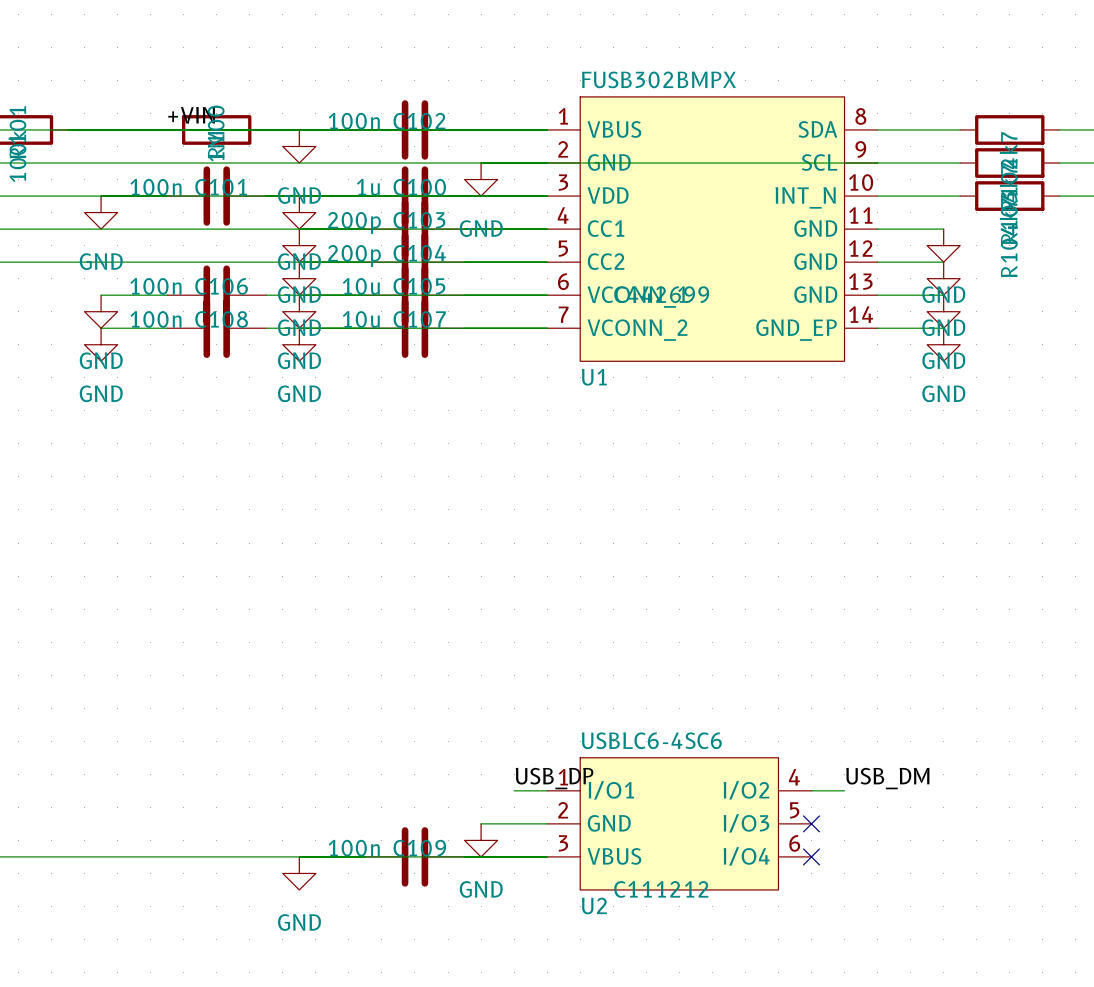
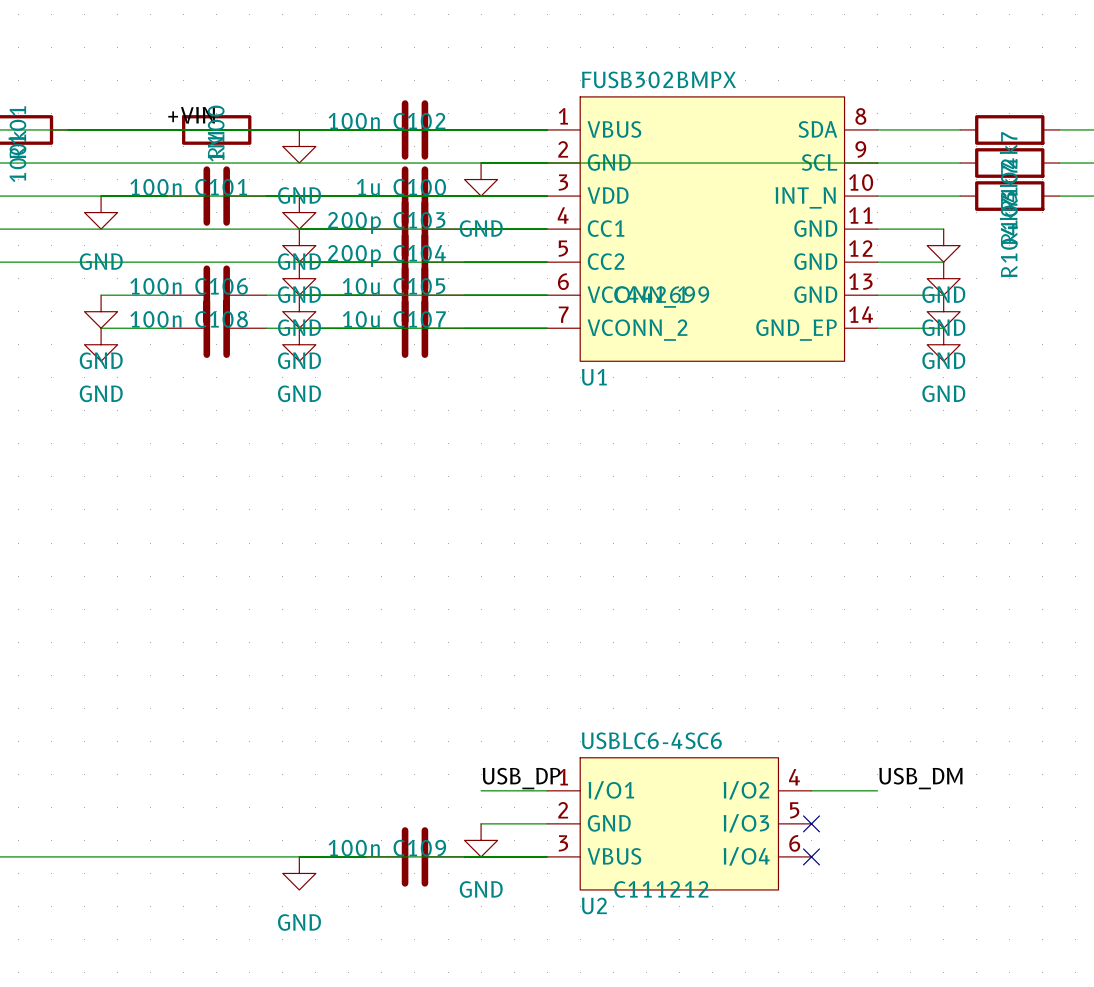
label position: USB_DP (554, 778) -> USB_DP (521, 778)
label position: USB_DM (887, 778) -> USB_DM (920, 778)
wire: none -> (481, 790) (514, 790)
wire: none -> (844, 790) (877, 790)

